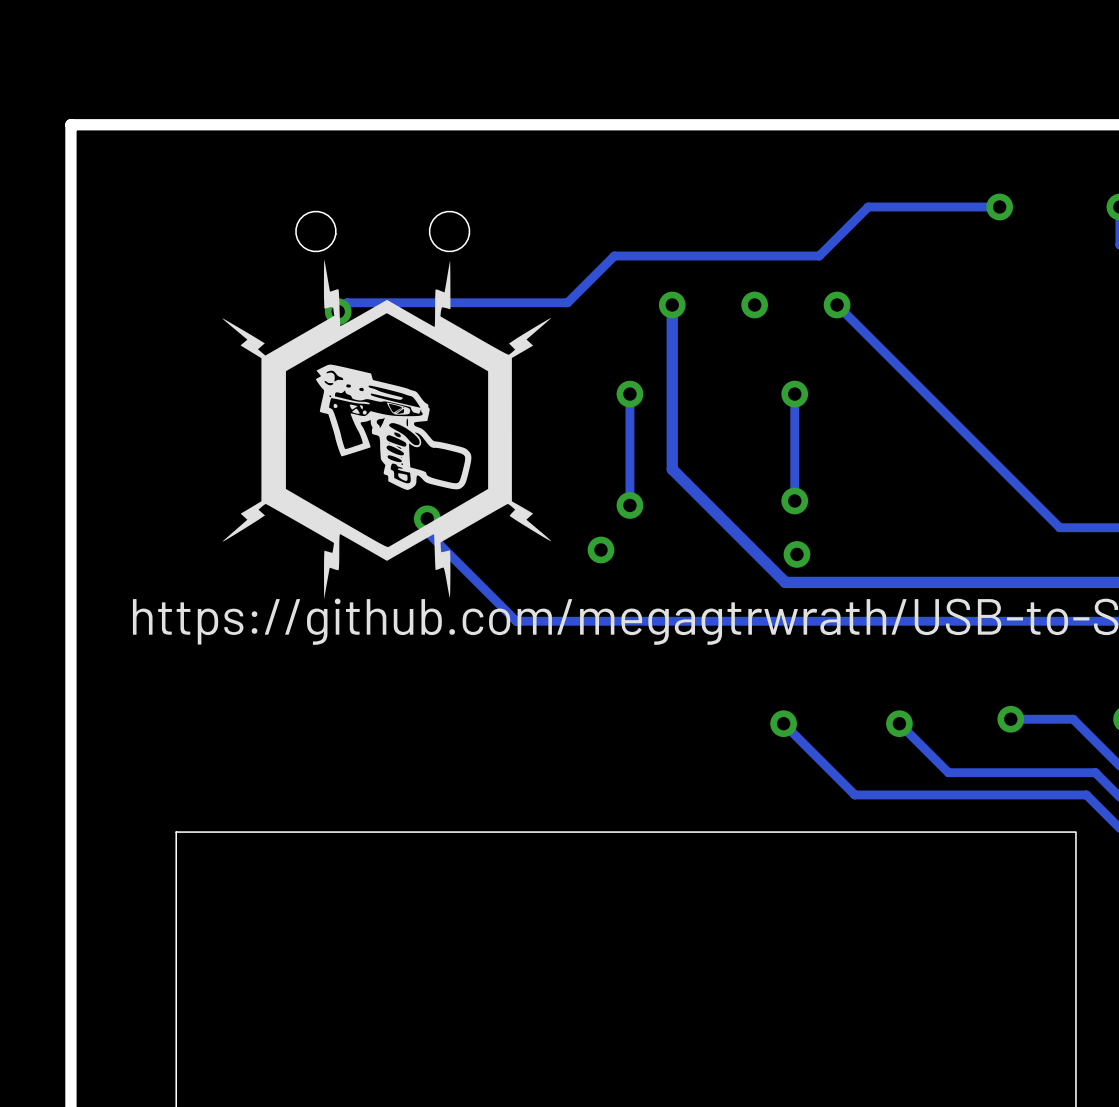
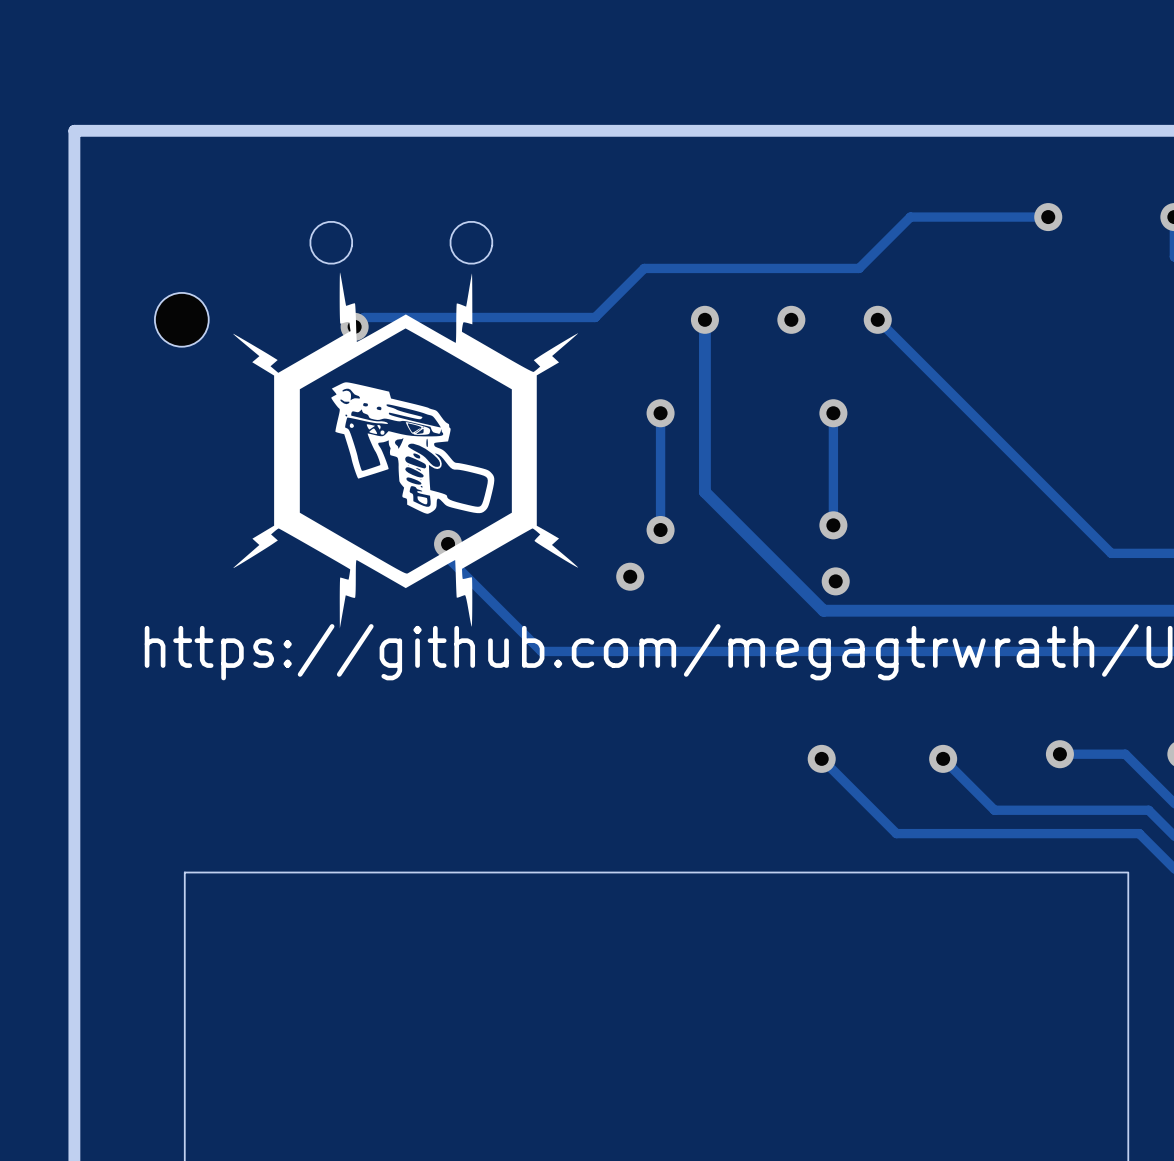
part: none -> (181, 319)

